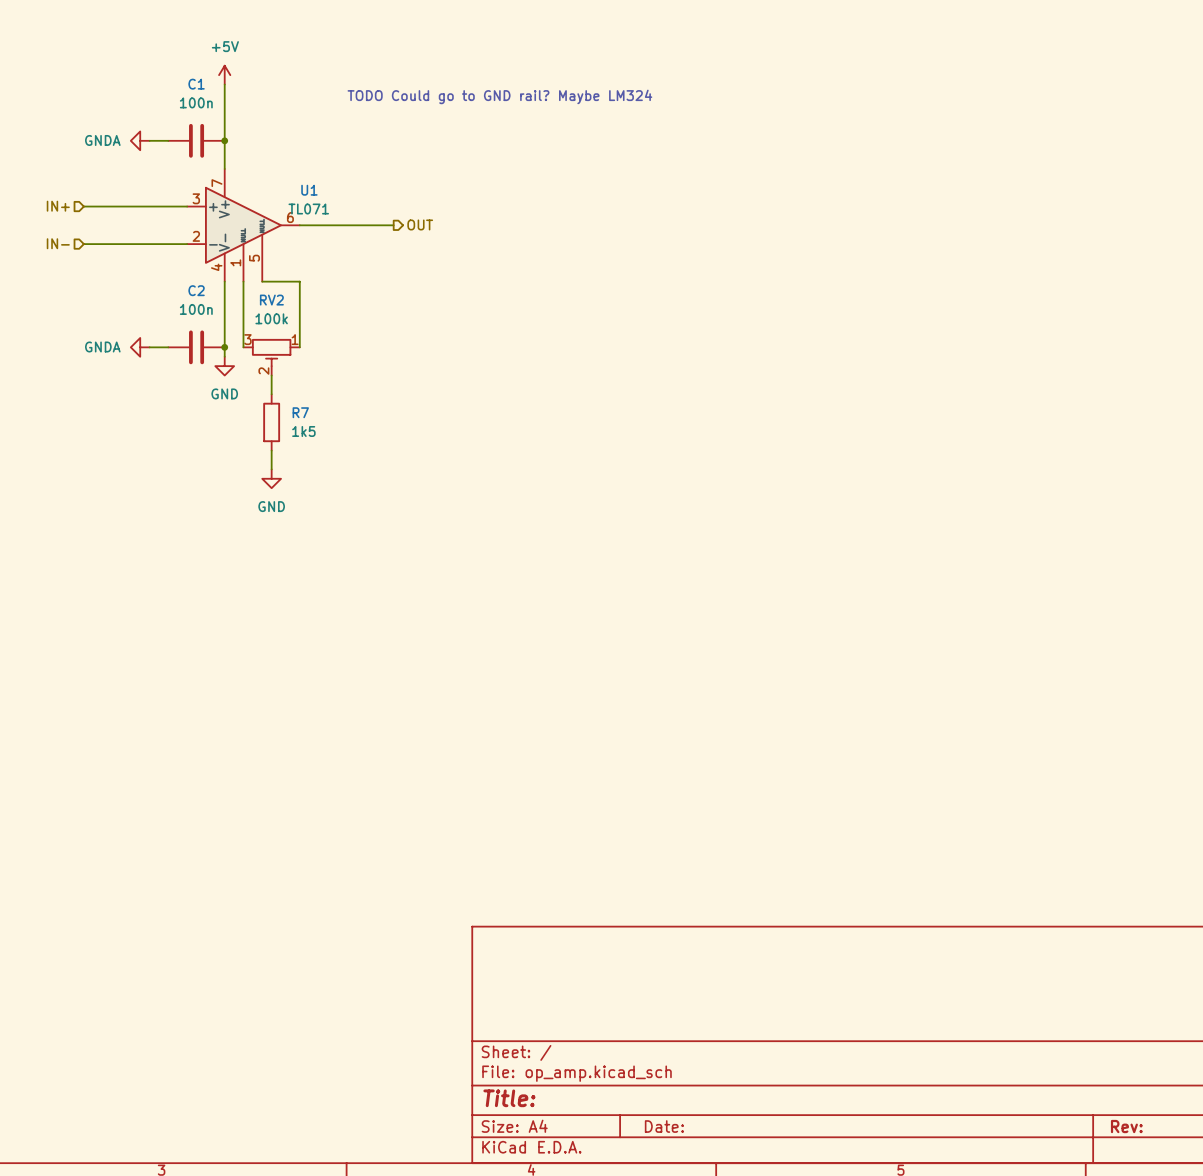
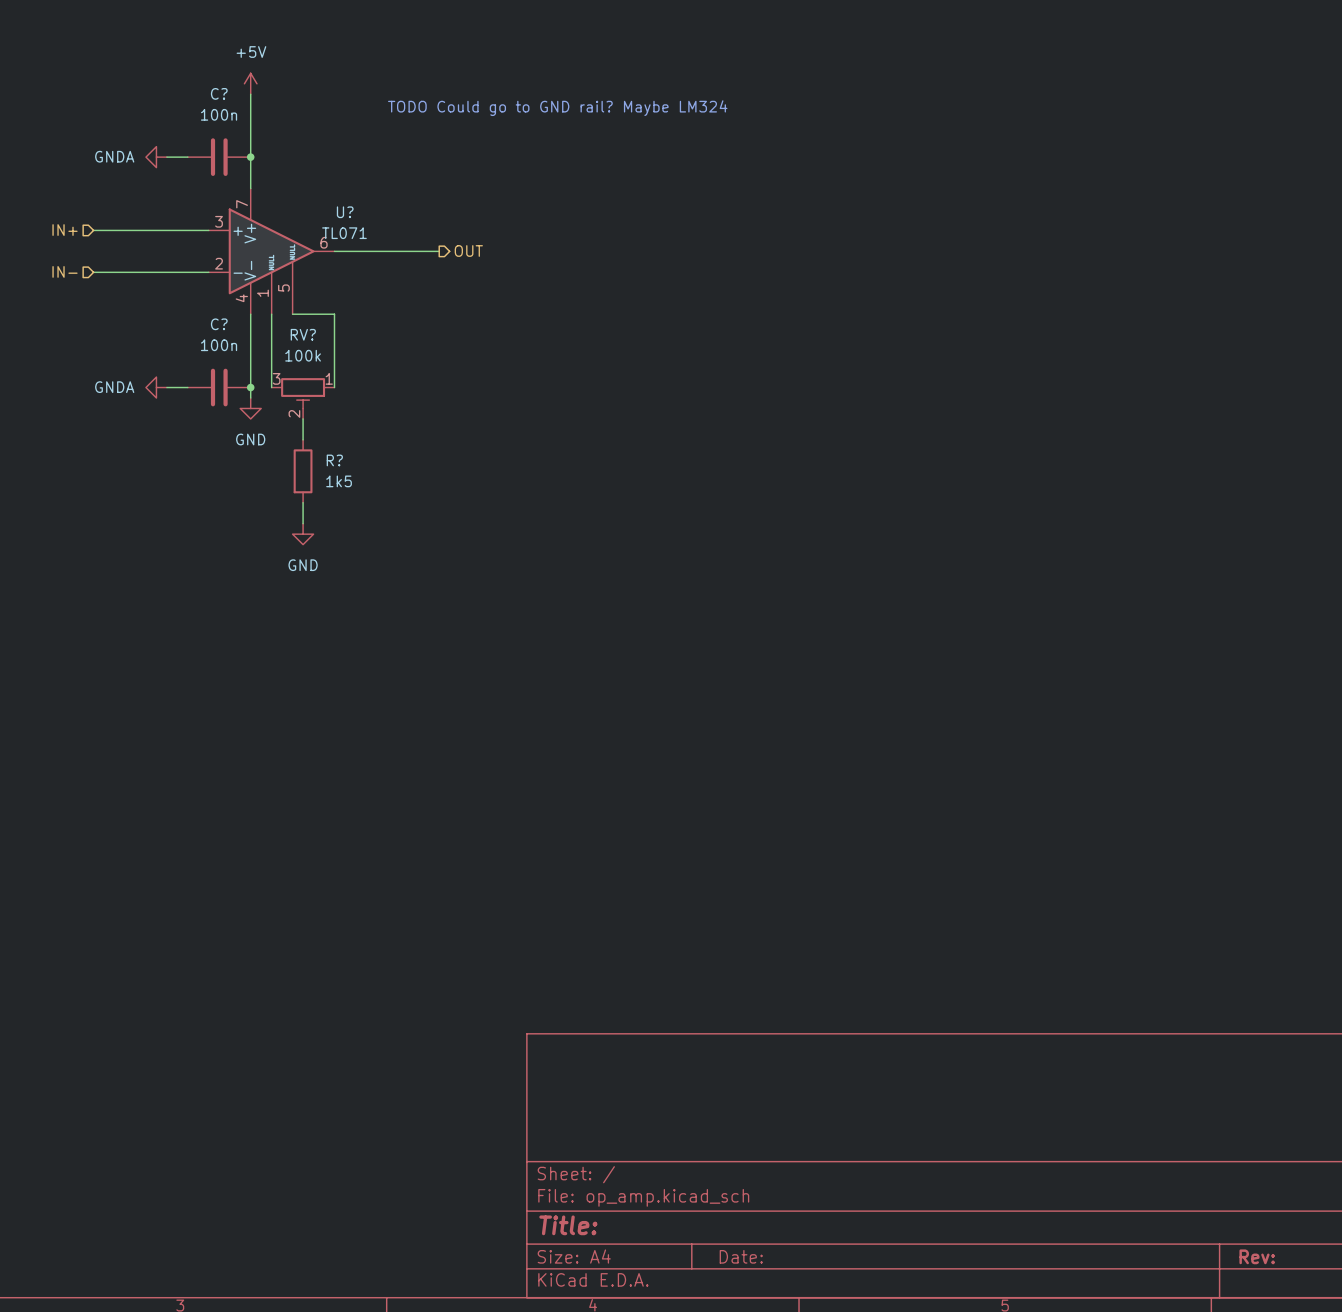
C1 name: C1 (196, 84) -> C? (219, 93)
U1 name: U1 (309, 190) -> U? (345, 212)
C2 name: C2 (196, 290) -> C? (219, 324)
RV2 name: RV2 (271, 300) -> RV? (303, 334)
R7 name: R7 (300, 412) -> R? (334, 460)

